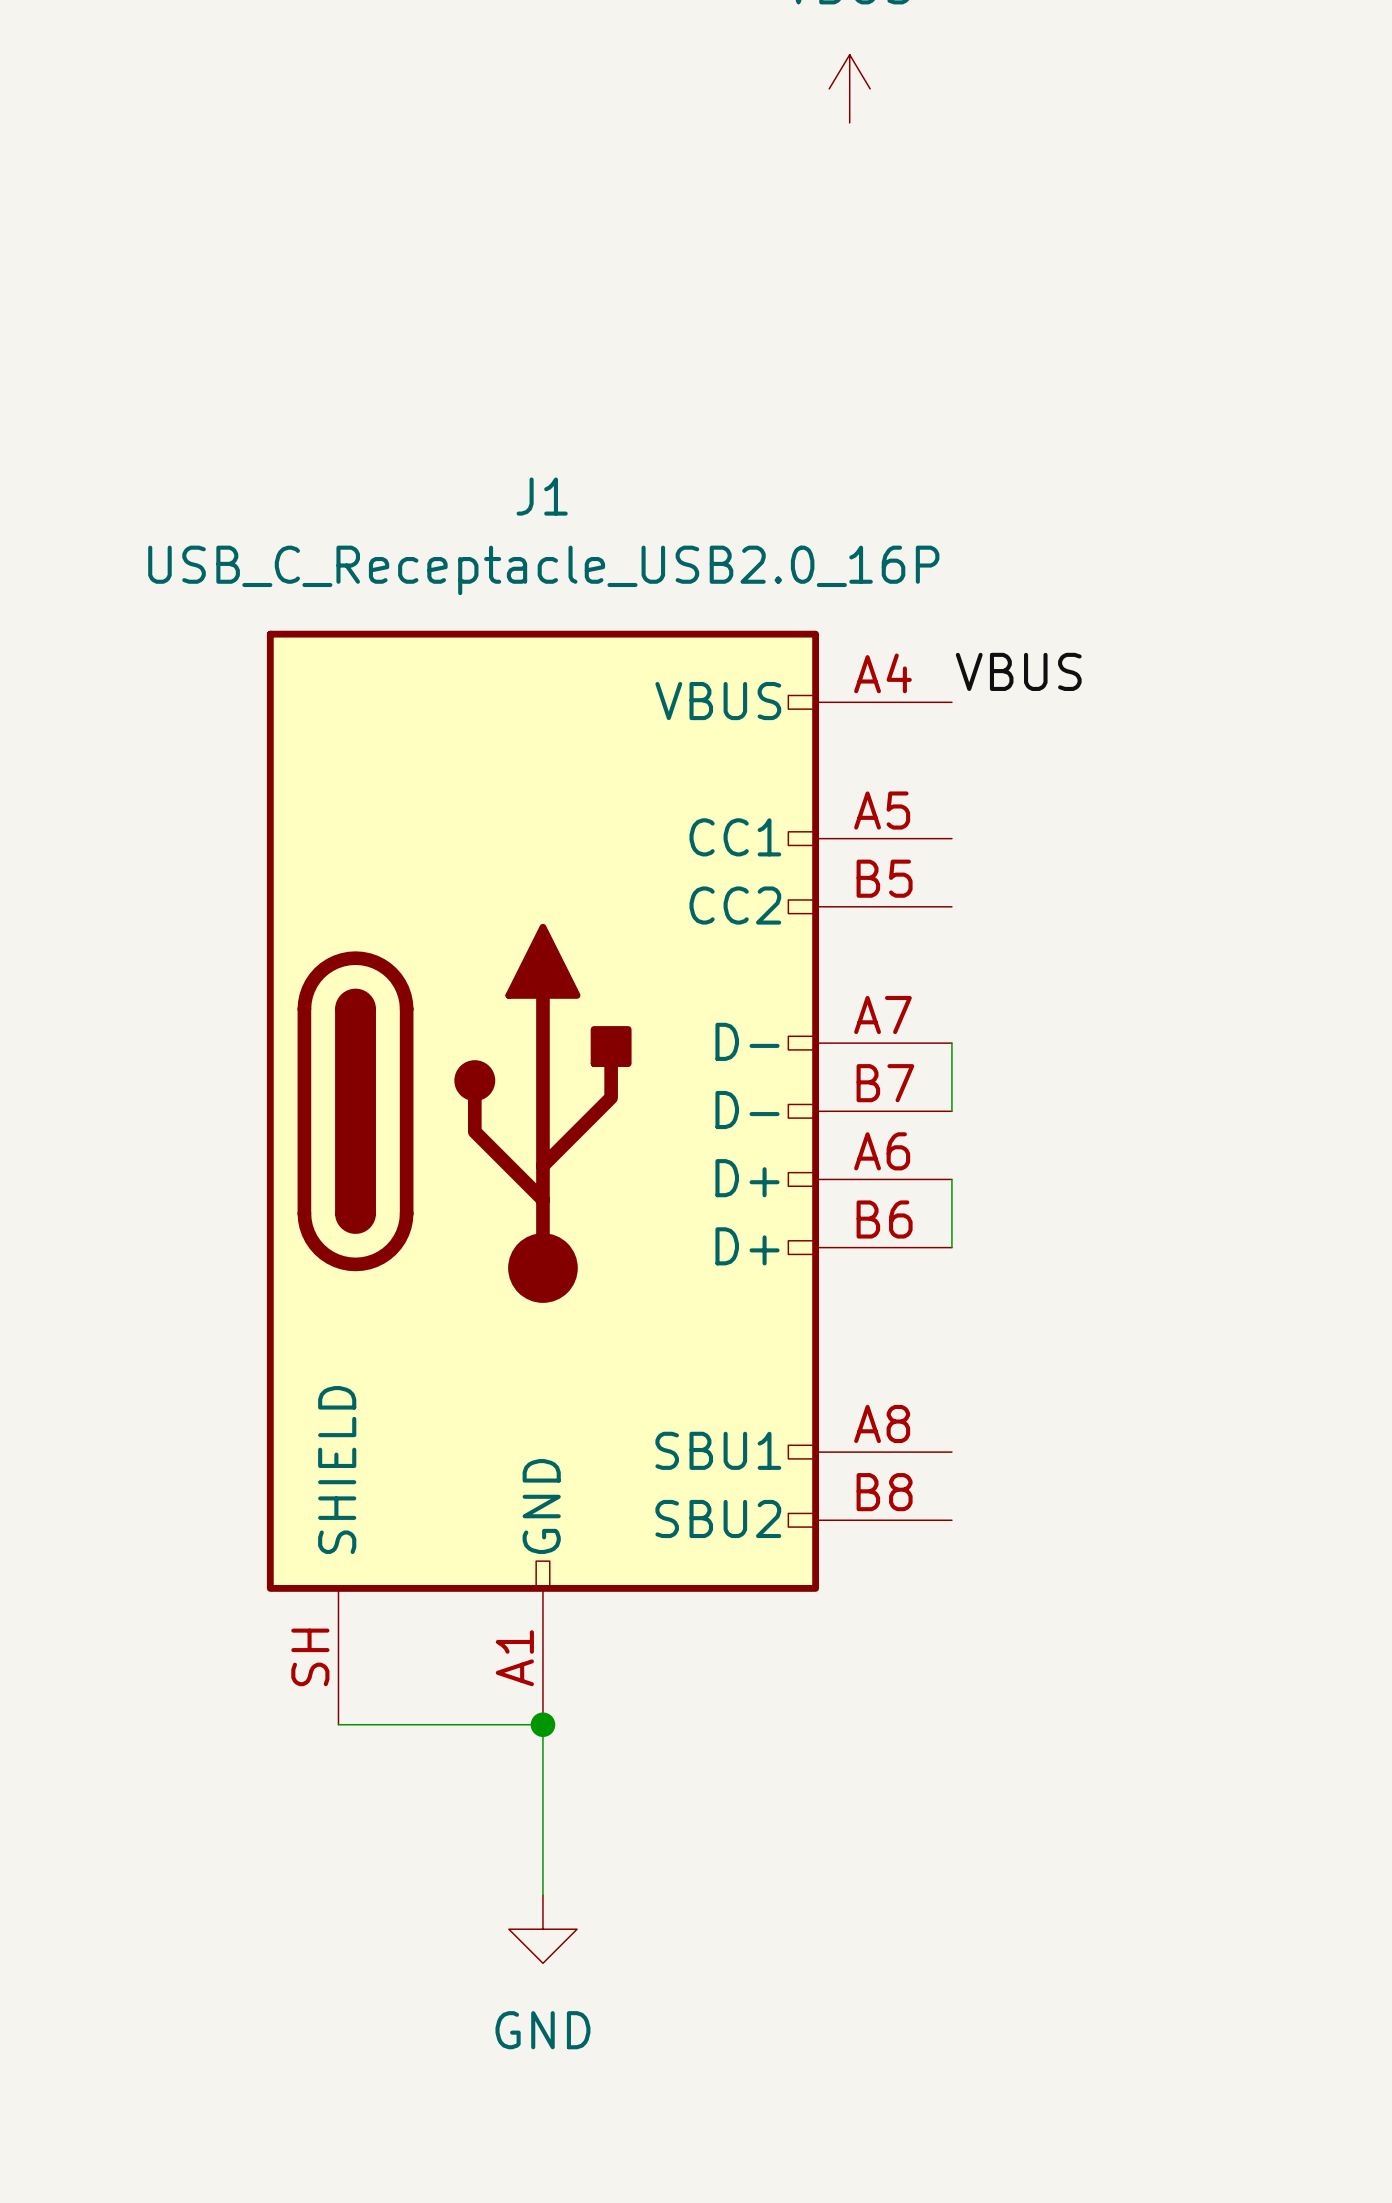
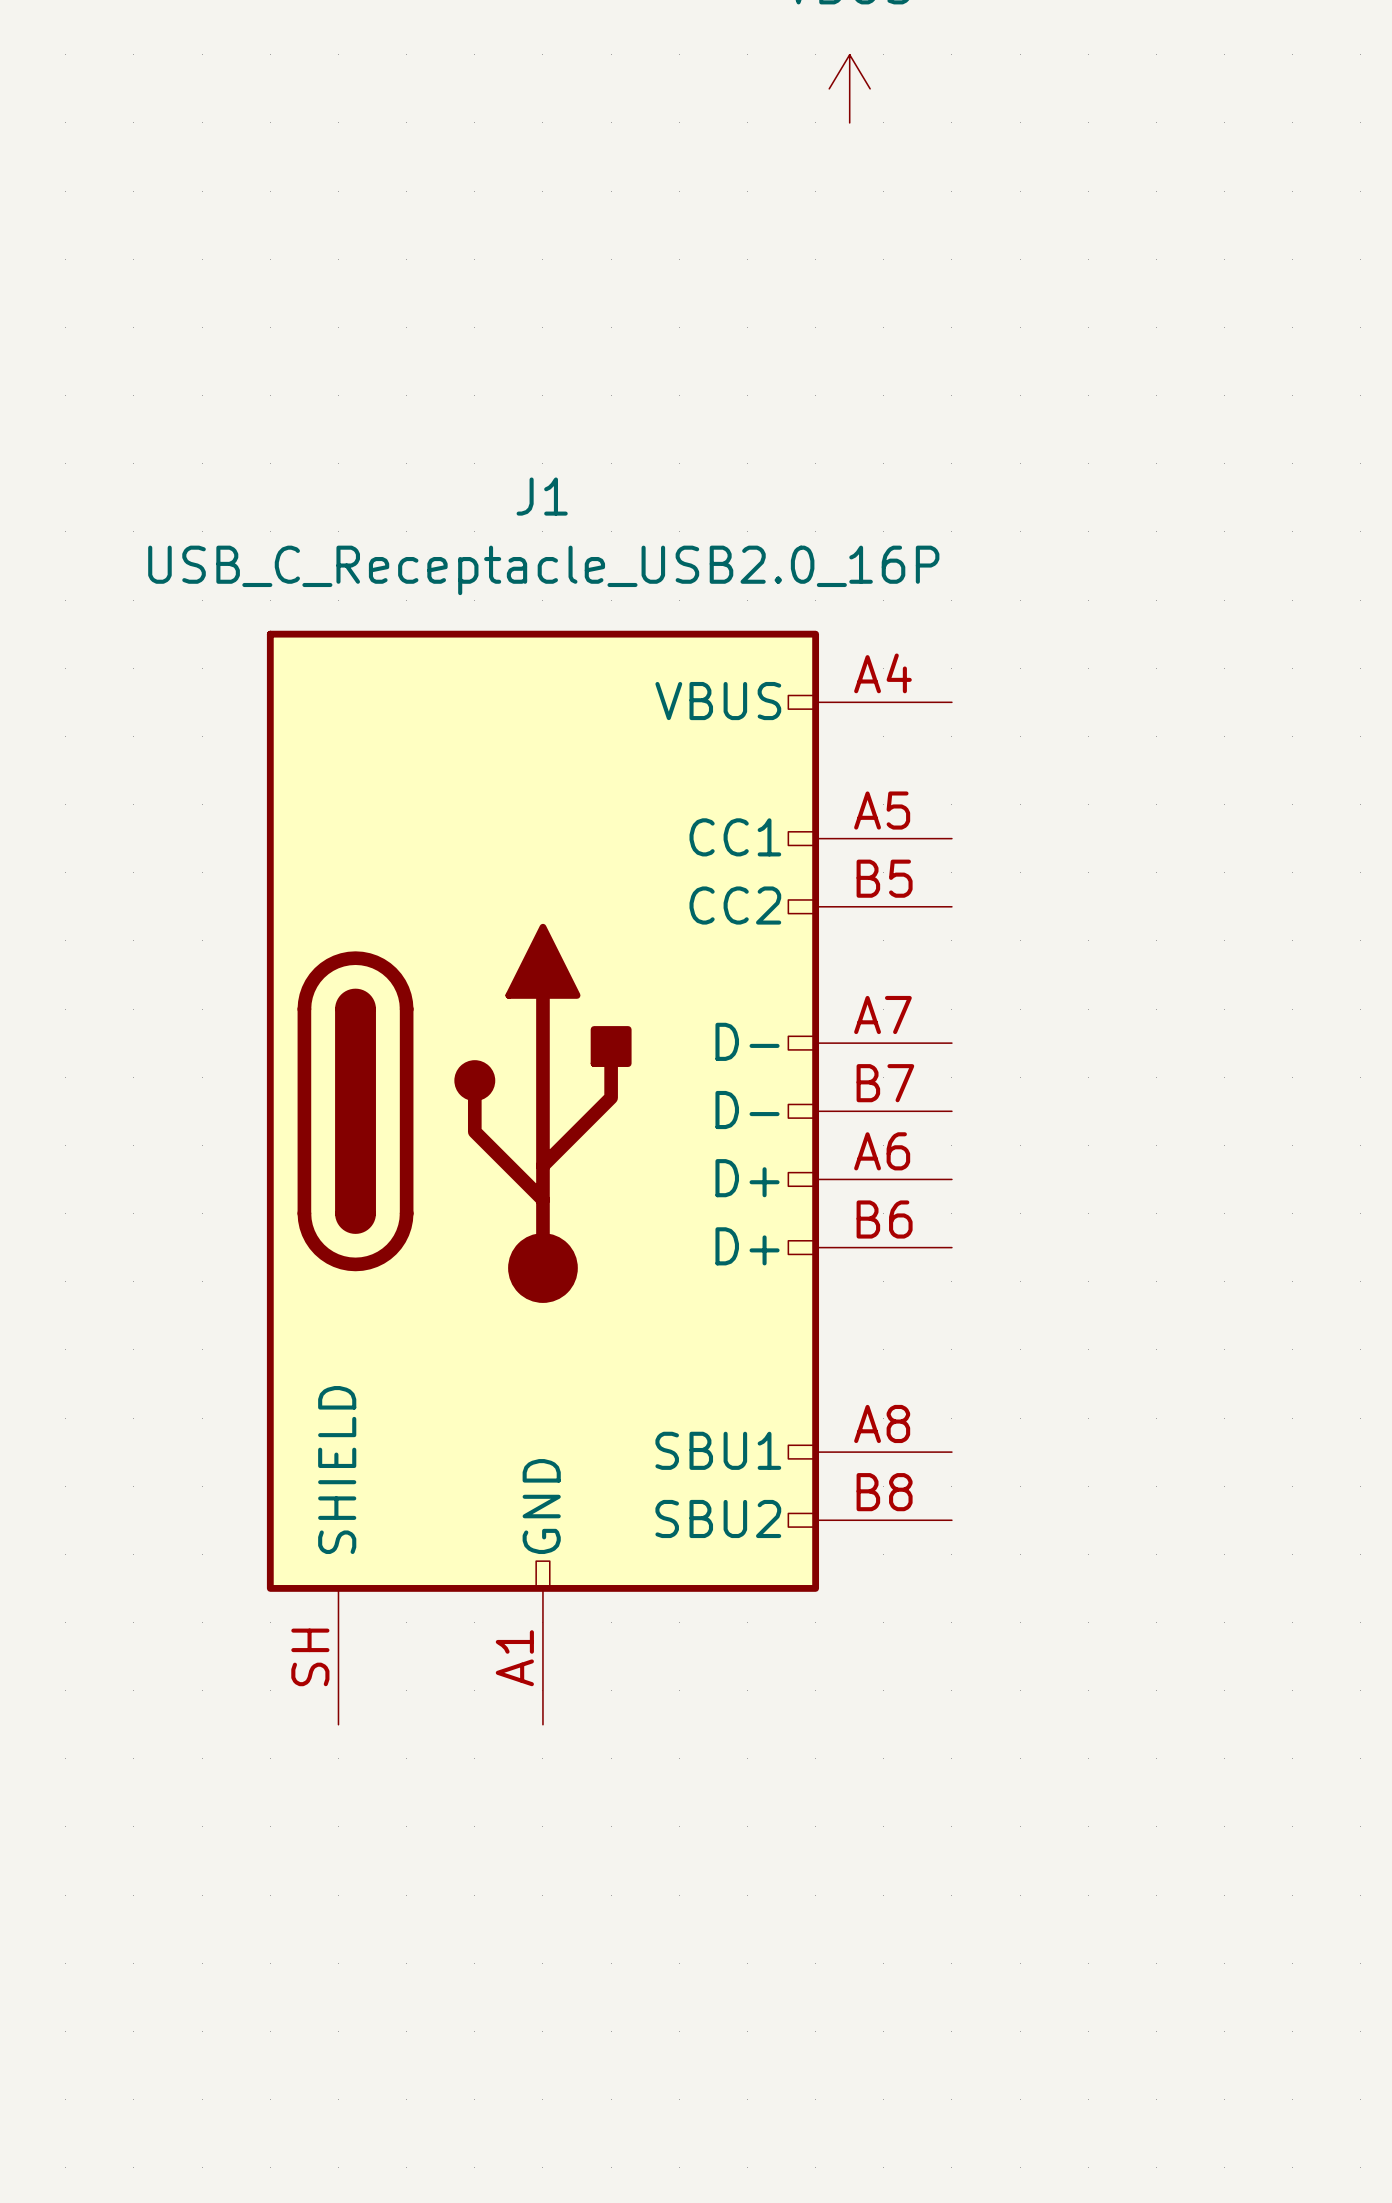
label: VBUS (1018, 671) -> none
wire: (951, 1043) (951, 1111) -> none
wire: (951, 1179) (951, 1247) -> none
wire: (338, 1724) (542, 1724) (542, 1895) -> none
junction: (542, 1724) -> none
power symbol: GND (542, 1929) -> none

